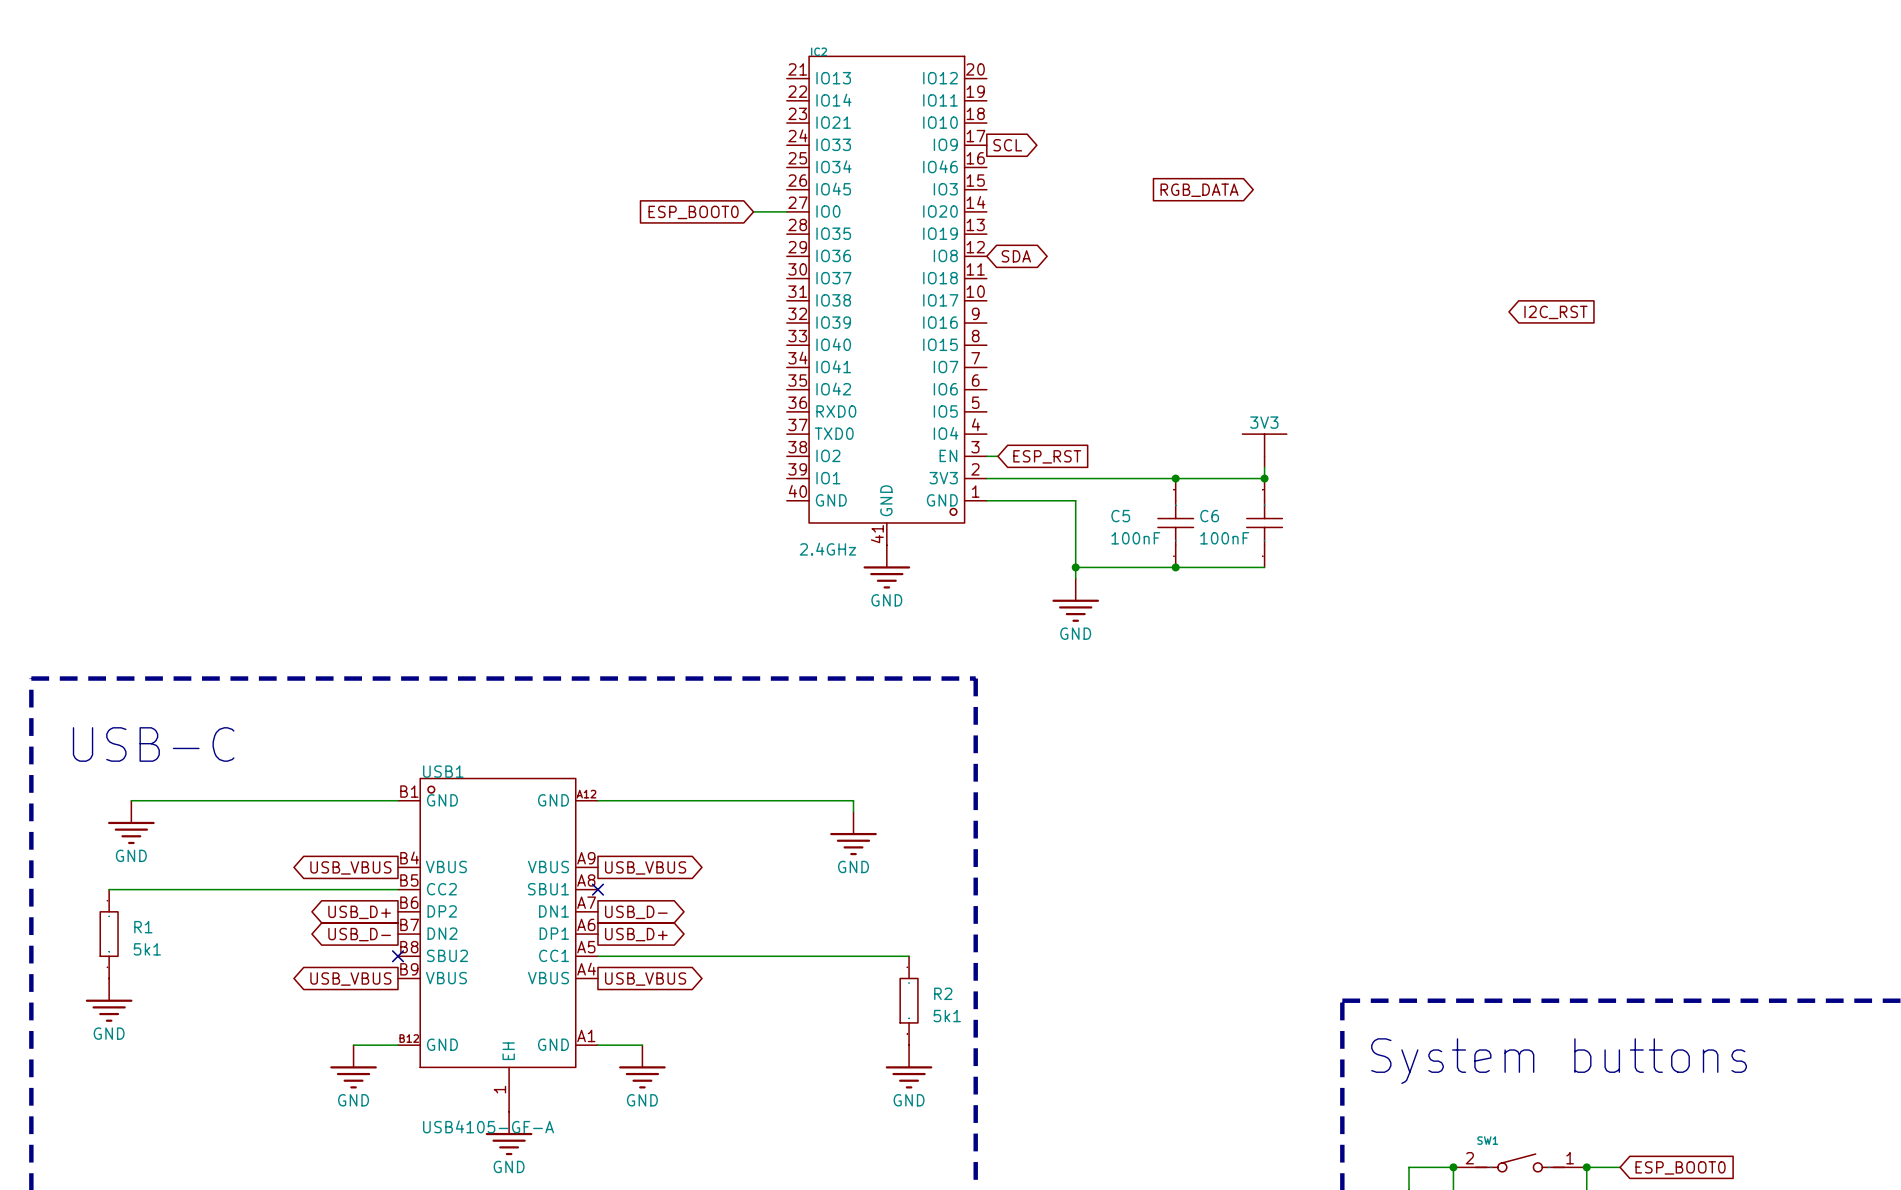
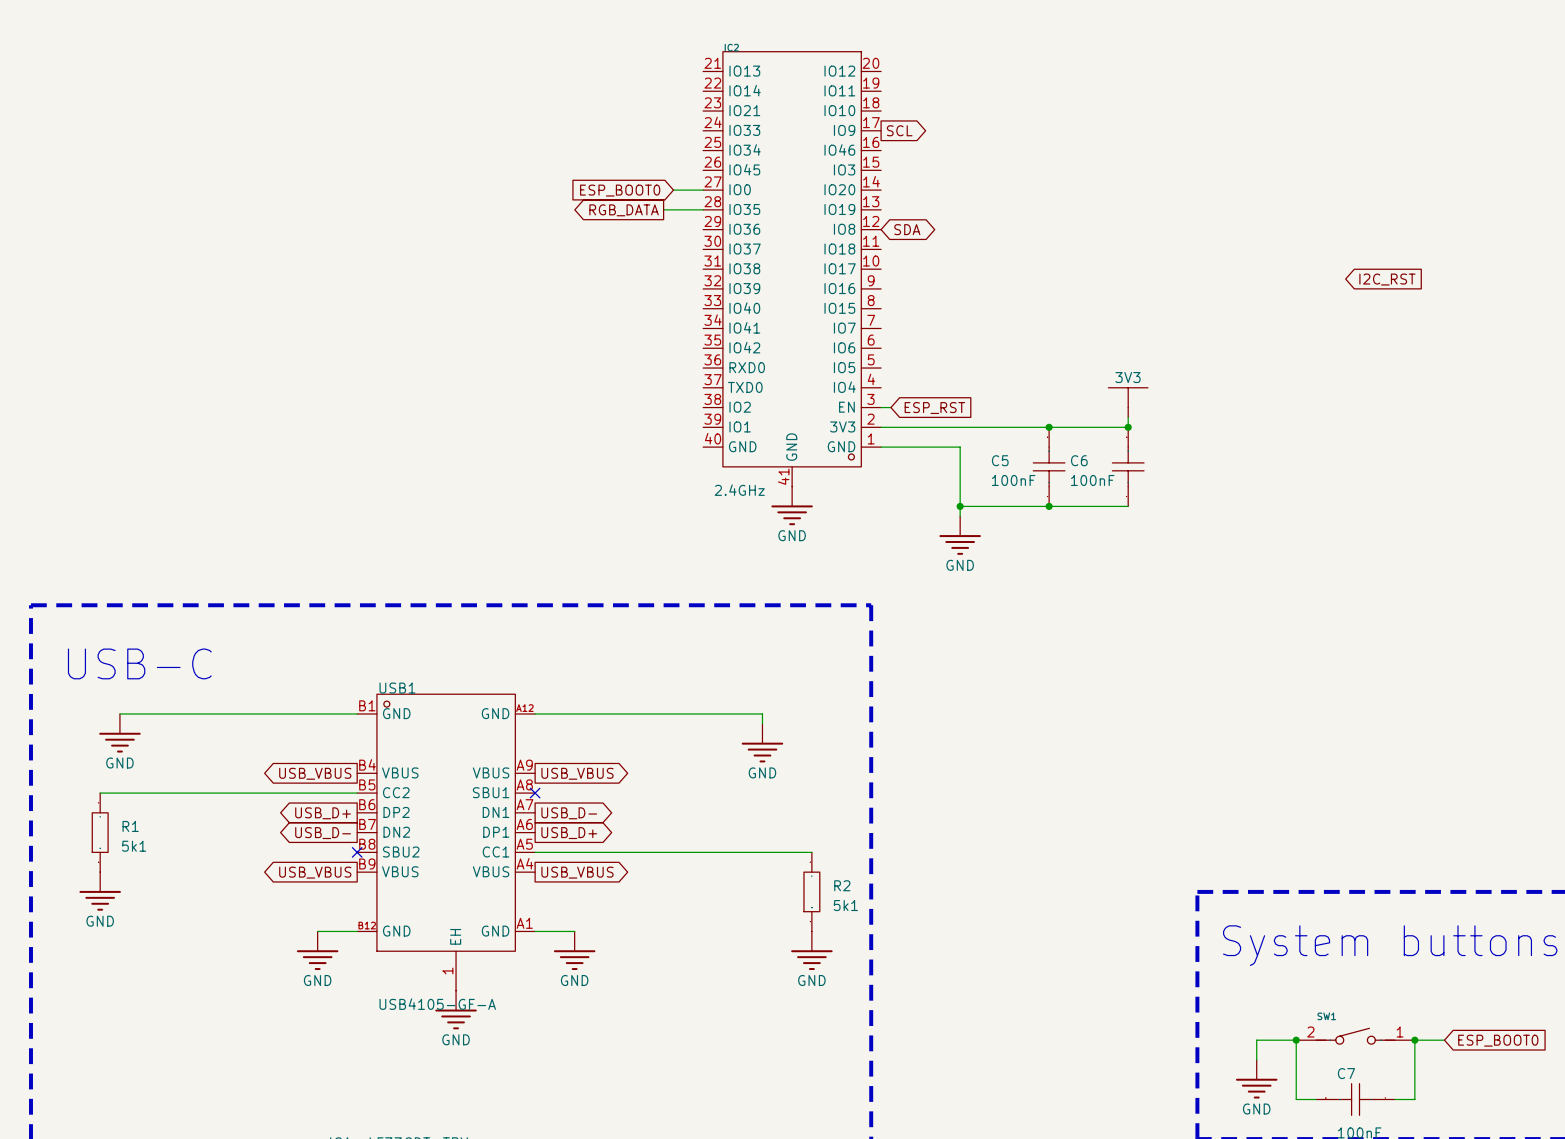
global label: RGB_DATA (1199, 190) -> none
global label: none -> RGB_DATA (624, 210)
wire: none -> (663, 209) (703, 209)

